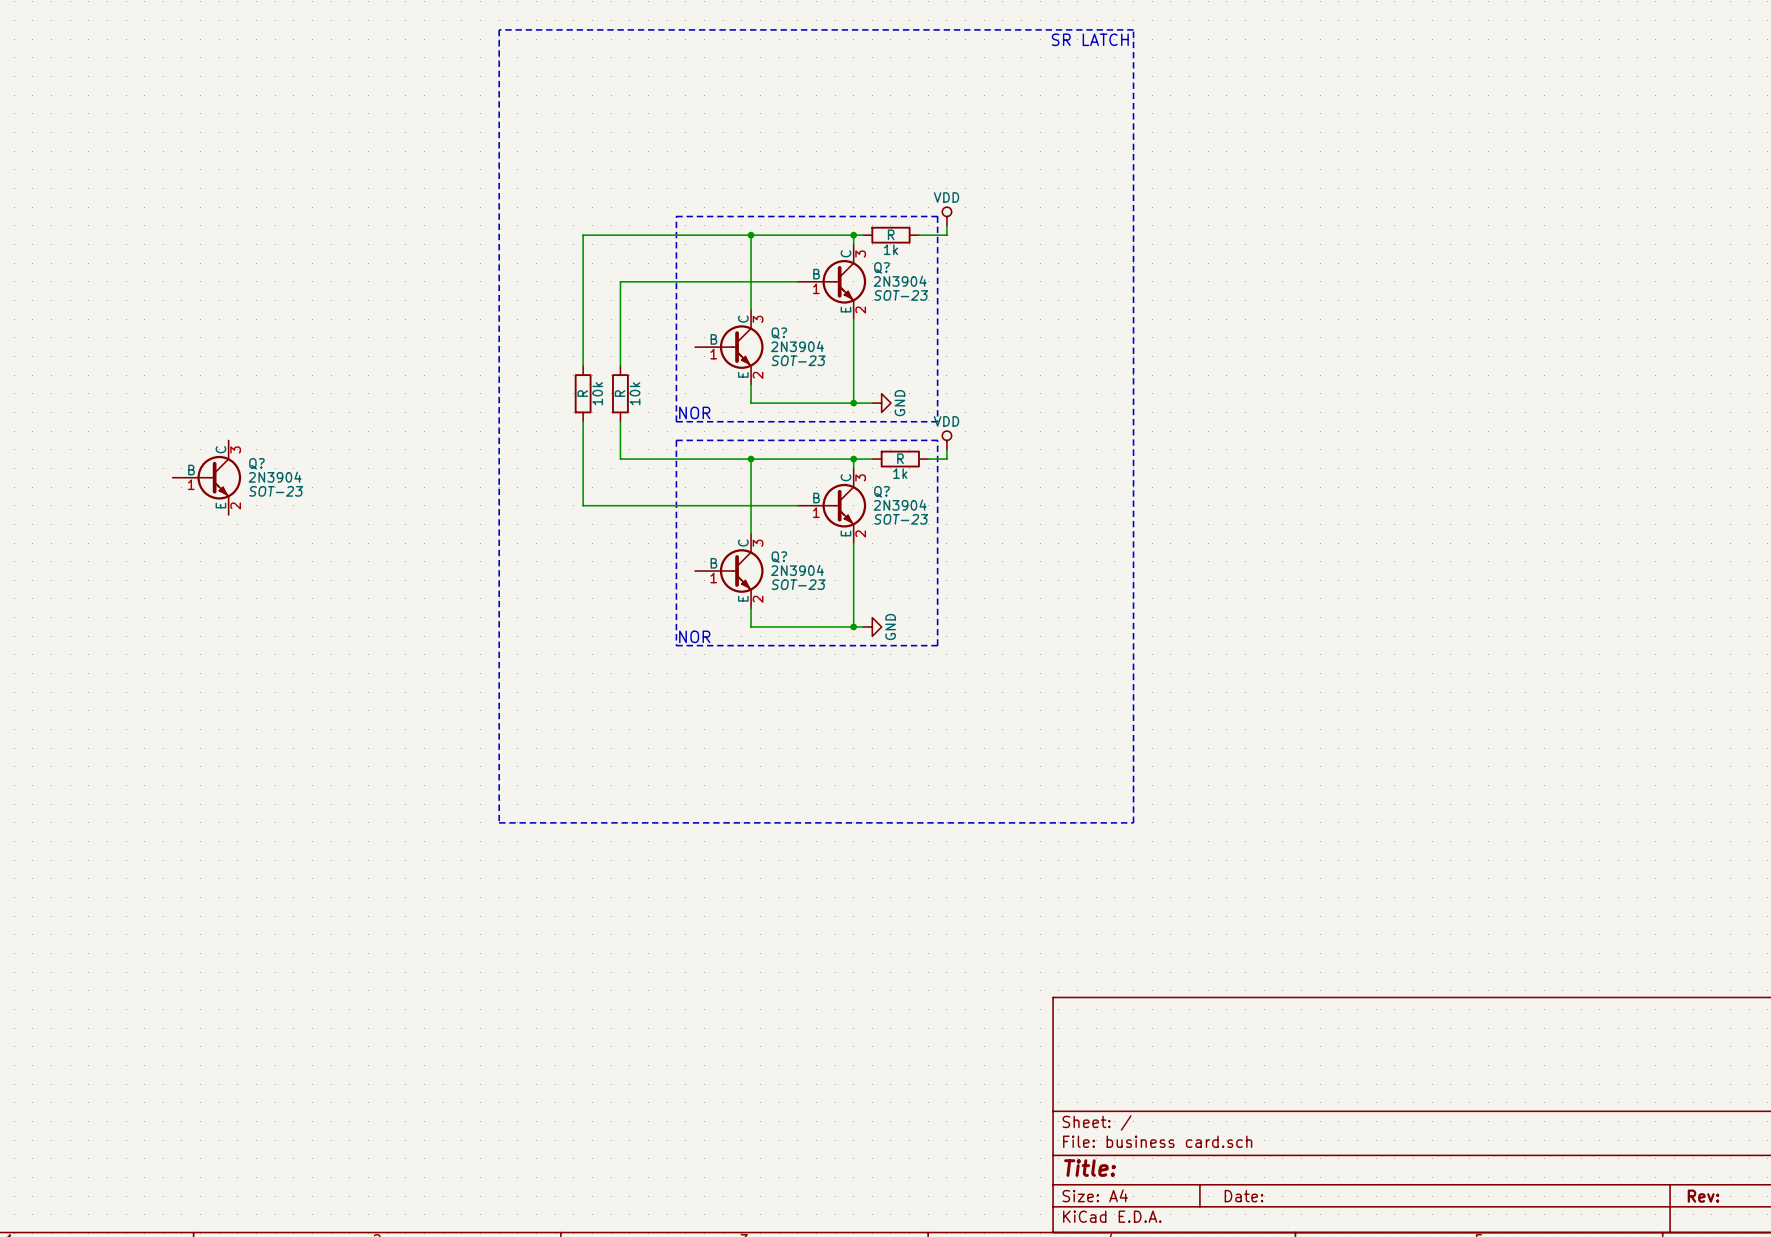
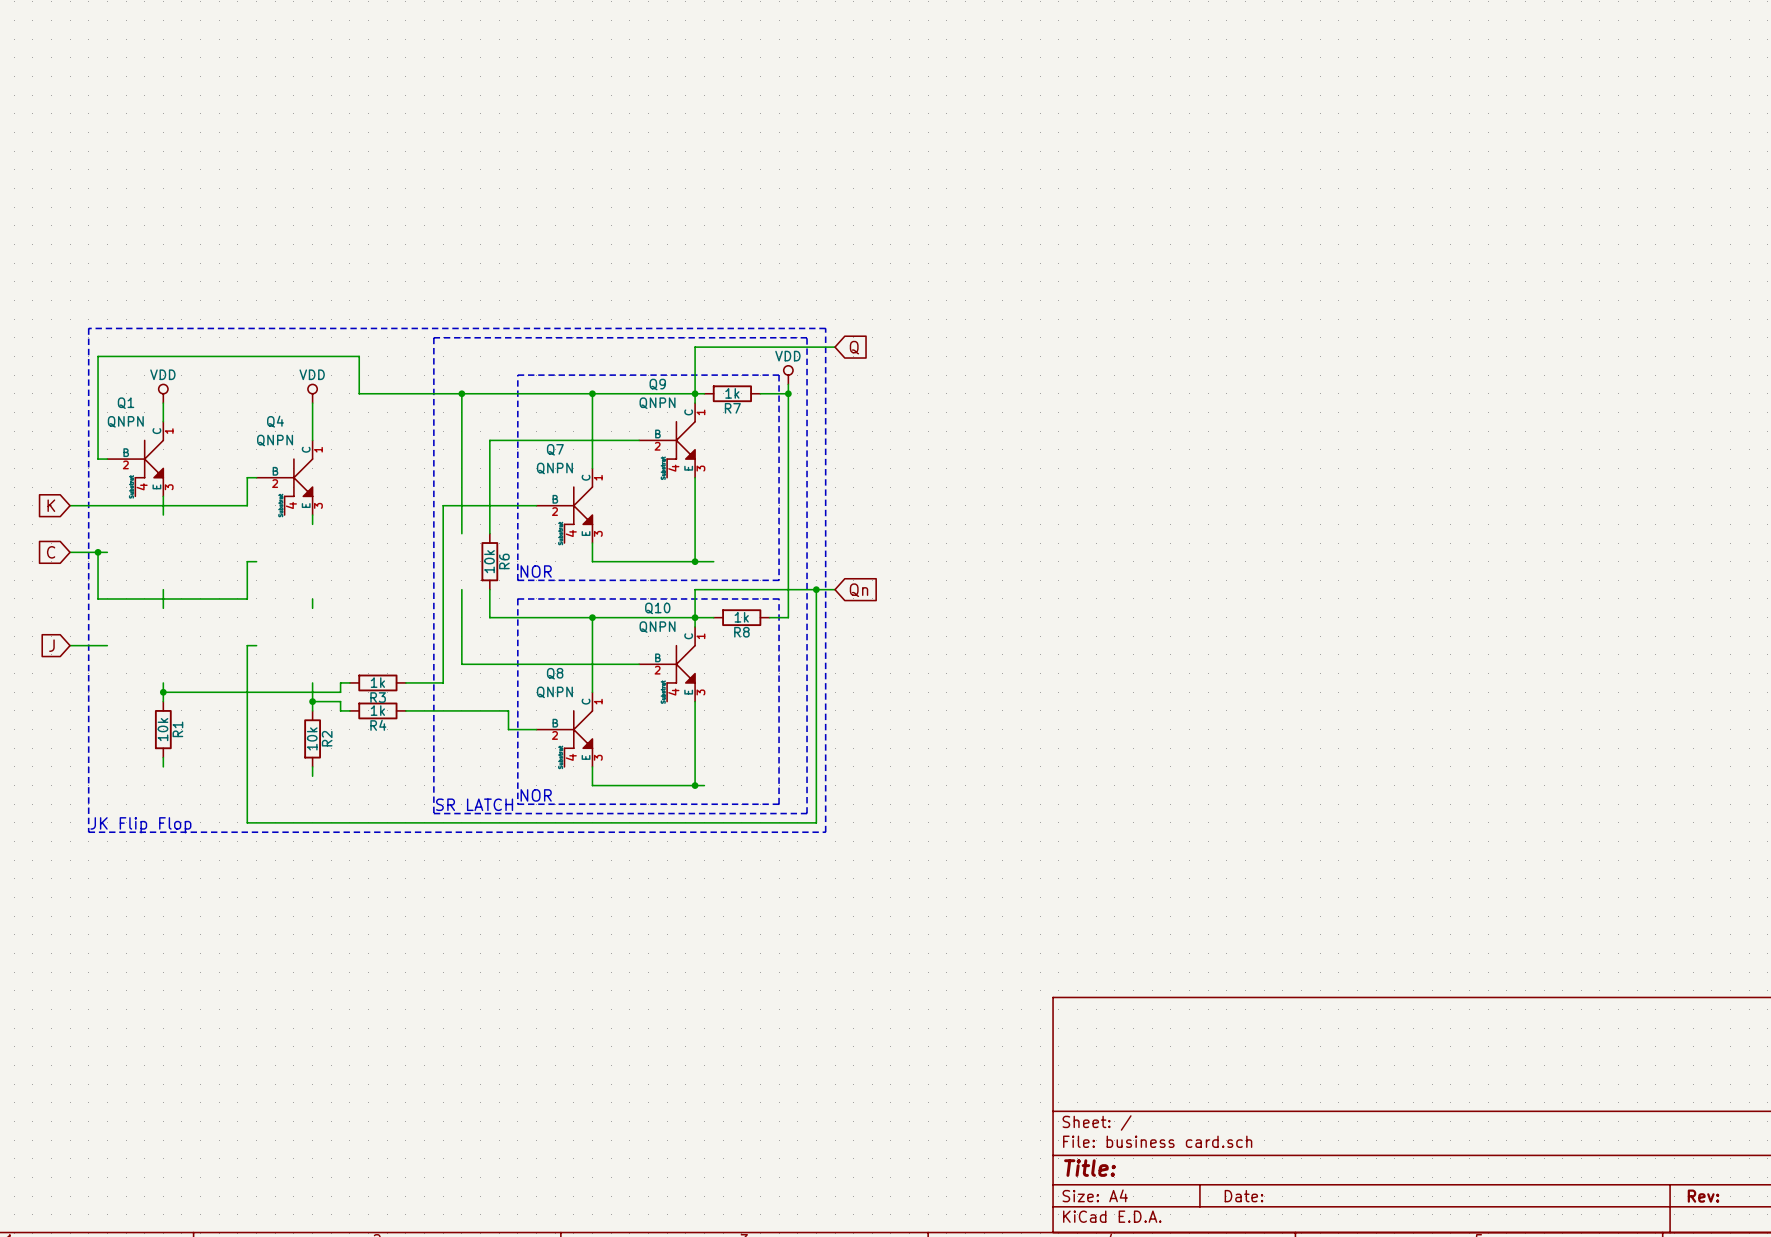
line: (499, 29) (1133, 29) (1133, 822) (499, 822) (499, 29) -> none
text: SR LATCH (1090, 39) -> none
line: (676, 216) (676, 421) (937, 421) (937, 216) (676, 216) -> none
power symbol: VDD (946, 216) -> none
wire: (946, 225) (946, 235) (918, 235) -> none
wire: (751, 235) (751, 309) -> none
junction: (751, 235) -> none
wire: (853, 235) (853, 244) -> none
junction: (853, 235) -> none
wire: (862, 235) (583, 235) (583, 365) -> none
1k: R (890, 235) -> none
wire: (797, 281) (620, 281) (620, 365) -> none
Q?: 2N3904 (831, 281) -> none
wire: (853, 319) (853, 403) -> none
line: none -> (88, 328) (88, 832) (825, 832) (825, 328) (88, 328)
line: none -> (433, 337) (807, 337) (807, 813) (433, 813) (433, 337)
Q?: 2N3904 (729, 347) -> none
wire: none -> (835, 347) (695, 347) (695, 403)
global label: none -> Q (854, 347)
power symbol: none -> VDD (788, 375)
wire: (751, 384) (751, 403) (872, 403) -> none
wire: none -> (788, 384) (788, 617) (769, 617)
power symbol: none -> VDD (163, 393)
power symbol: none -> VDD (312, 393)
wire: none -> (461, 393) (461, 533)
junction: none -> (461, 393)
10k: R (583, 393) -> none
junction: none -> (592, 393)
10k: R (620, 393) -> none
junction: none -> (695, 393)
wire: none -> (704, 393) (359, 393) (359, 356) (98, 356) (98, 459) (107, 459)
R7: none -> 1k (732, 393)
wire: none -> (760, 393) (788, 393)
junction: none -> (788, 393)
wire: none -> (163, 403) (163, 421)
wire: none -> (312, 403) (312, 440)
junction: (853, 403) -> none
power symbol: GND (881, 403) -> none
text: NOR (694, 412) -> none
wire: (583, 421) (583, 505) (797, 505) -> none
wire: (620, 421) (620, 459) (872, 459) -> none
wire: none -> (639, 440) (489, 440) (489, 533)
Q9: none -> QNPN (667, 440)
line: (676, 440) (937, 440) (937, 645) (676, 645) (676, 440) -> (517, 375) (779, 375) (779, 580) (517, 580) (517, 375)
power symbol: VDD (946, 440) -> none
wire: (946, 449) (946, 459) (928, 459) -> none
Q1: none -> QNPN (135, 459)
wire: (751, 459) (751, 533) -> (592, 393) (592, 468)
junction: (751, 459) -> none
wire: (853, 459) (853, 468) -> none
junction: (853, 459) -> none
1k: R (900, 459) -> none
Q?: 2N3904 (206, 477) -> none
wire: none -> (256, 477) (247, 477) (247, 505) (70, 505)
Q4: none -> QNPN (284, 477)
wire: none -> (163, 496) (163, 515)
global label: none -> K (51, 505)
wire: none -> (536, 505) (443, 505) (443, 682) (405, 682)
Q7: none -> QNPN (564, 505)
Q?: 2N3904 (831, 505) -> none
wire: none -> (312, 515) (312, 524)
wire: none -> (592, 543) (592, 561) (713, 561)
wire: (853, 543) (853, 626) -> (695, 477) (695, 561)
global label: none -> C (51, 552)
wire: none -> (70, 552) (107, 552)
wire: none -> (98, 552) (98, 598) (247, 598) (247, 561) (256, 561)
junction: none -> (98, 552)
R6: none -> 10k (489, 561)
junction: none -> (695, 561)
text: none -> NOR (536, 571)
Q?: 2N3904 (729, 571) -> none
wire: none -> (163, 589) (163, 608)
wire: none -> (461, 589) (461, 664) (639, 664)
wire: none -> (489, 589) (489, 617) (713, 617)
wire: none -> (816, 589) (816, 822) (247, 822) (247, 645) (256, 645)
junction: none -> (816, 589)
wire: none -> (835, 589) (695, 589) (695, 626)
global label: none -> Qn (859, 590)
wire: none -> (312, 598) (312, 608)
line: none -> (517, 598) (779, 598) (779, 804) (517, 804) (517, 598)
wire: (751, 608) (751, 626) (862, 626) -> none
wire: none -> (592, 617) (592, 692)
junction: none -> (592, 617)
junction: none -> (695, 617)
R8: none -> 1k (741, 617)
junction: (853, 626) -> none
power symbol: GND (872, 626) -> none
text: NOR (694, 636) -> none
global label: none -> J (51, 645)
wire: none -> (70, 645) (107, 645)
Q10: none -> QNPN (667, 664)
wire: none -> (163, 682) (163, 701)
wire: none -> (312, 682) (312, 710)
wire: none -> (349, 682) (340, 682) (340, 692) (163, 692)
R3: none -> 1k (377, 682)
junction: none -> (163, 692)
wire: none -> (312, 701) (340, 701) (340, 710) (349, 710)
junction: none -> (312, 701)
wire: none -> (695, 701) (695, 785)
R4: none -> 1k (377, 710)
wire: none -> (405, 710) (508, 710) (508, 729) (536, 729)
R1: none -> 10k (163, 729)
Q8: none -> QNPN (564, 729)
R2: none -> 10k (312, 738)
wire: none -> (163, 757) (163, 766)
wire: none -> (312, 766) (312, 776)
wire: none -> (592, 766) (592, 785) (704, 785)
junction: none -> (695, 785)
text: none -> NOR (536, 795)
text: none -> SR LATCH (474, 804)
text: none -> JK Flip Flop (140, 825)

